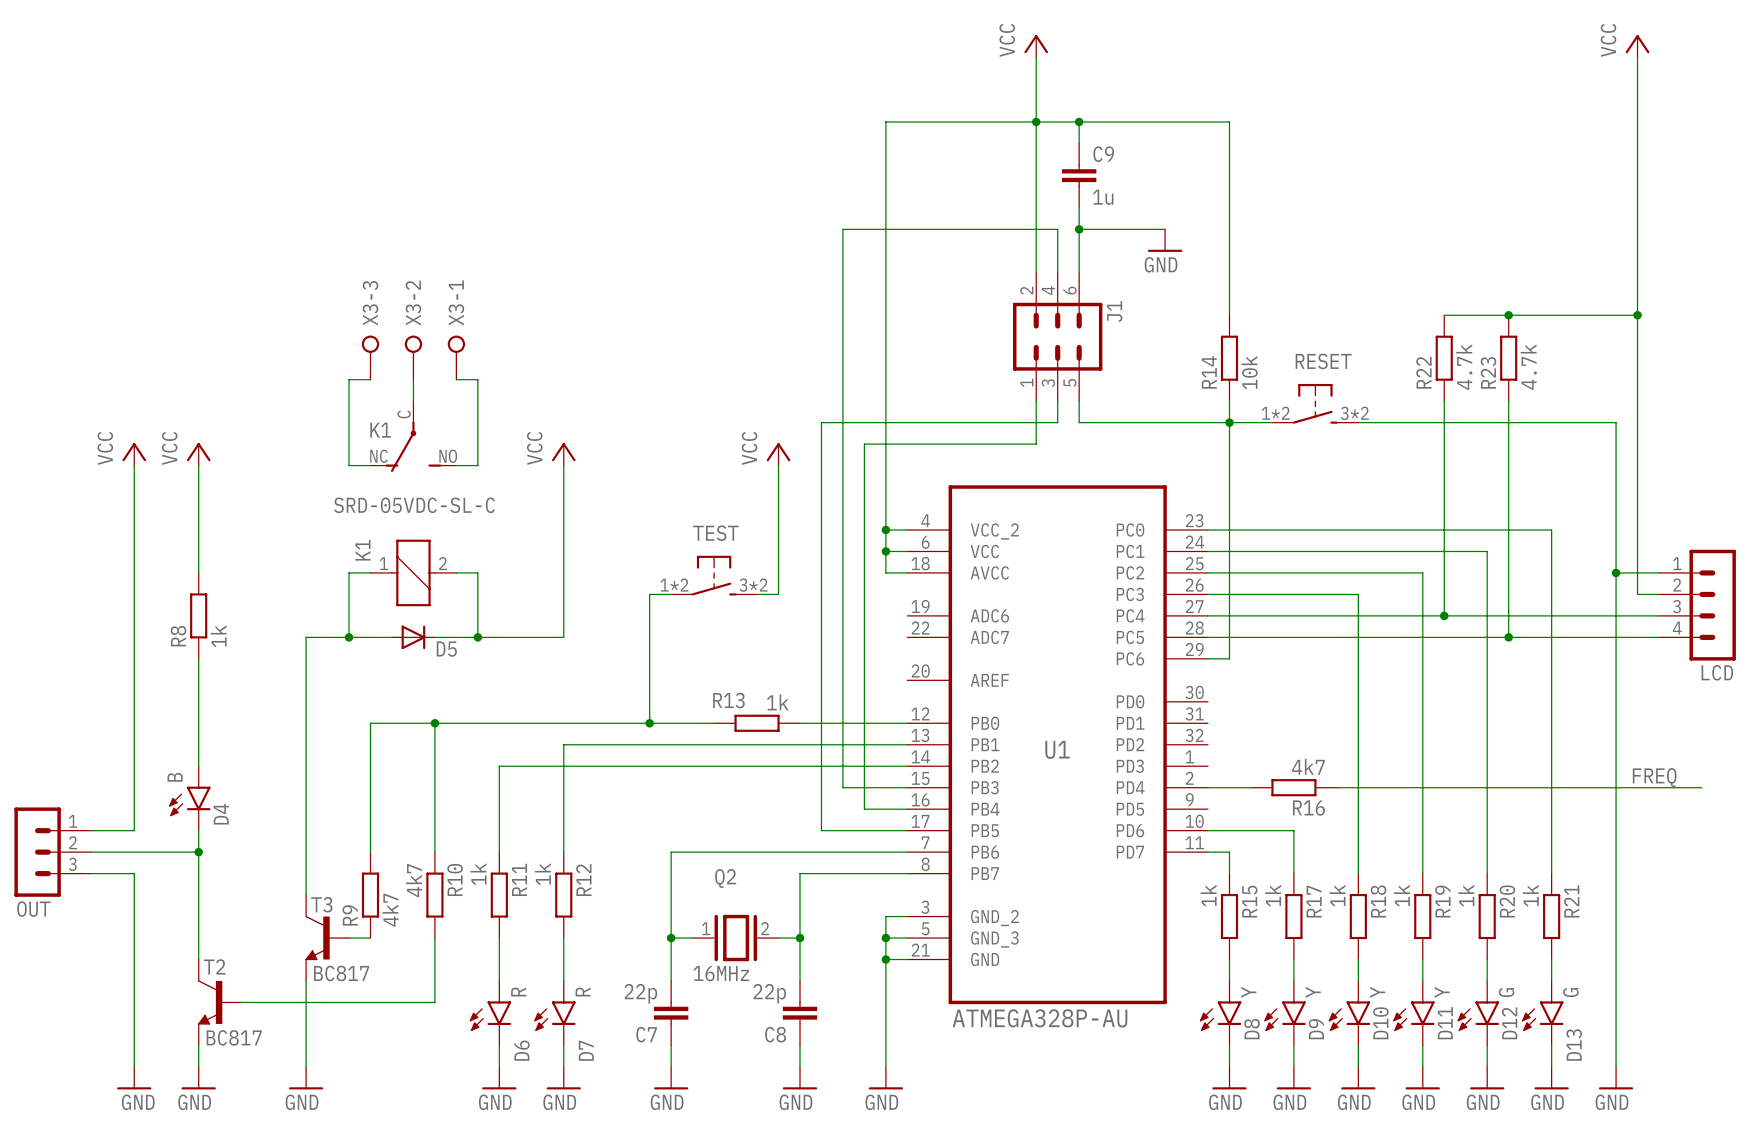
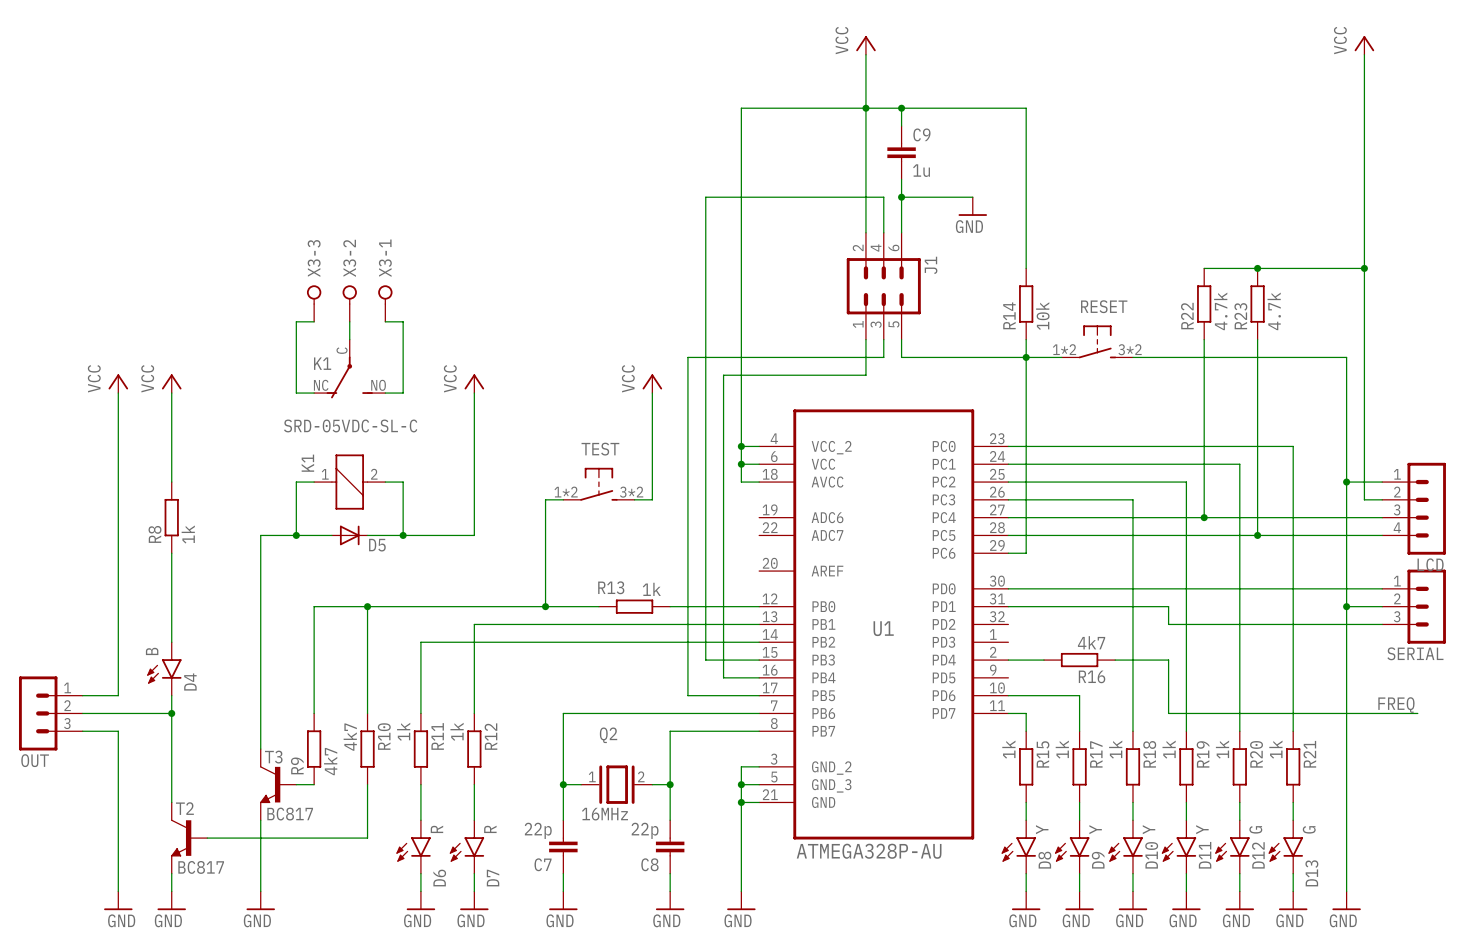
wire: none -> (1008, 588) (1382, 588)
wire: none -> (1008, 606) (1168, 606) (1168, 624) (1382, 624)
wire: none -> (1346, 606) (1382, 606)
junction: none -> (1346, 606)
SERIAL: none -> (1414, 606)
label position: FREQ (1654, 777) -> FREQ (1396, 705)
wire: (1401, 787) (1701, 787) -> (1168, 660) (1168, 713) (1417, 713)

